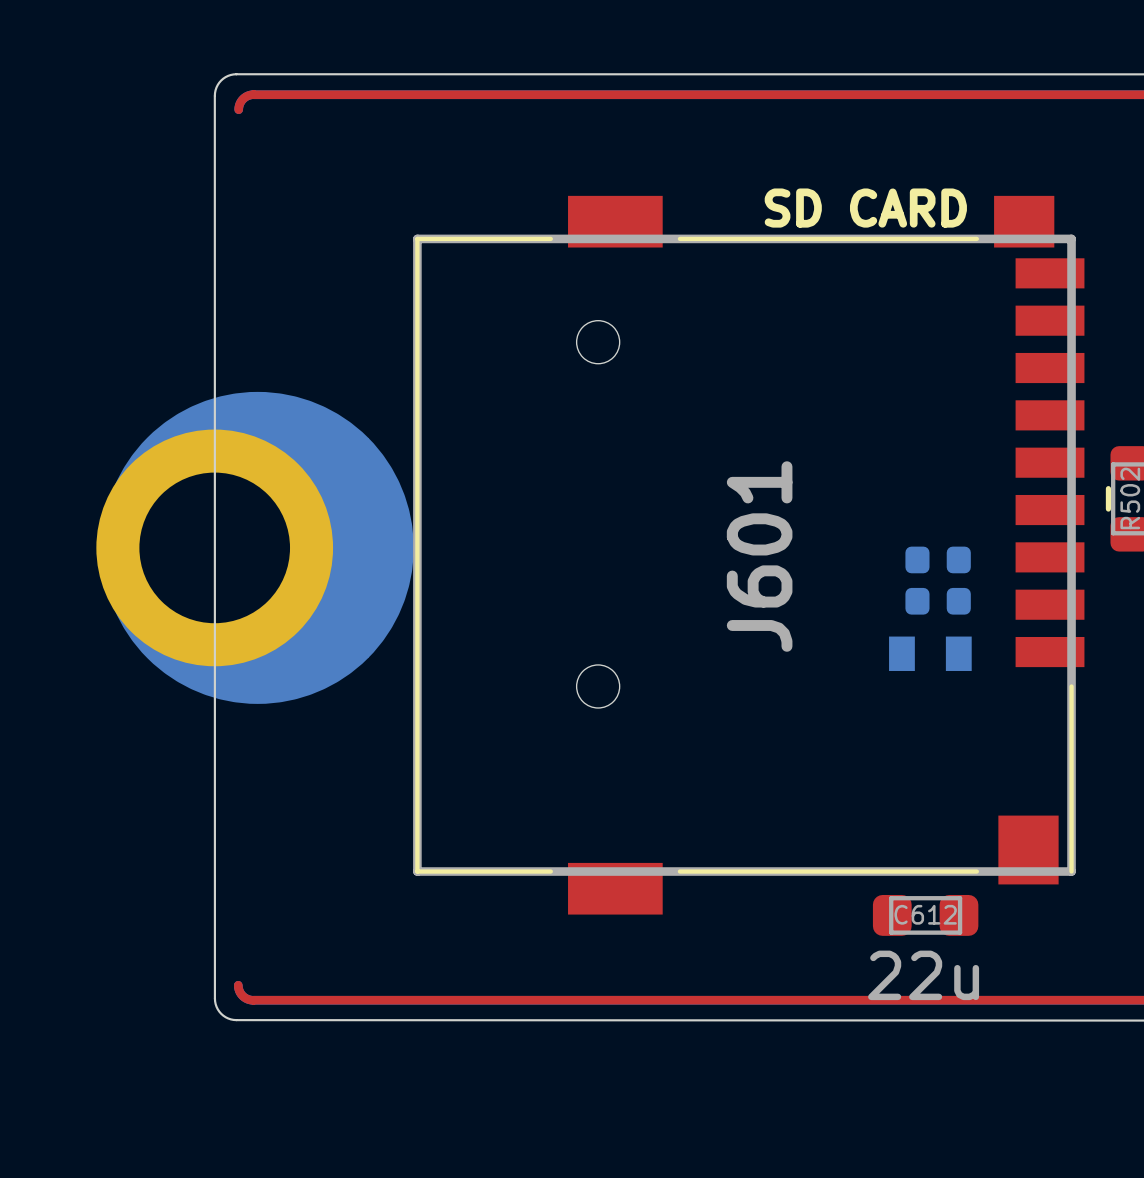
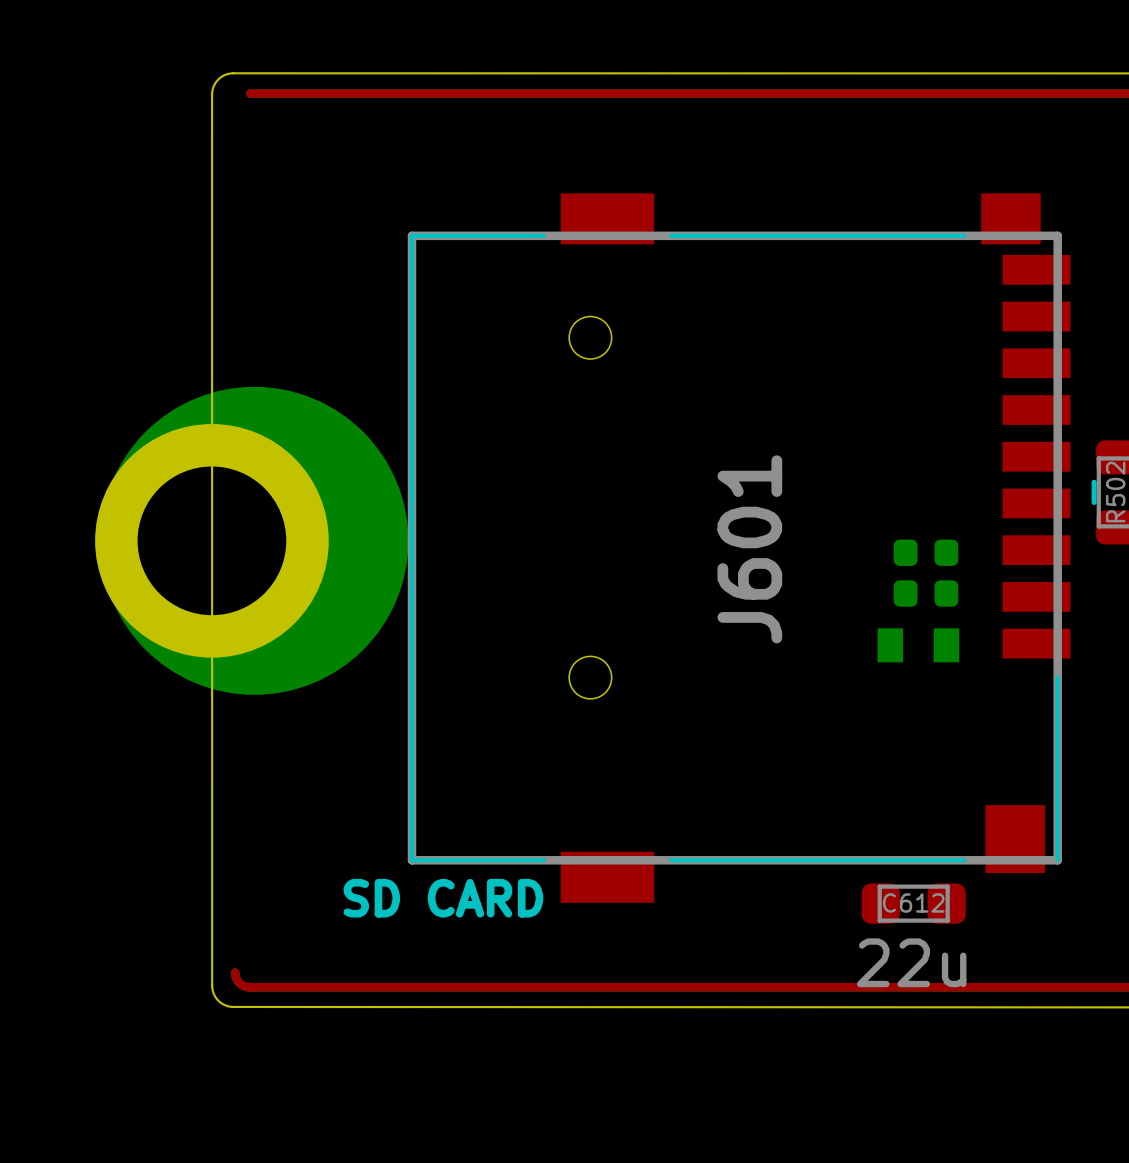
top track: (253, 94) (243, 99) (238, 109) -> none
text position: SD CARD (865, 208) -> SD CARD (443, 898)

